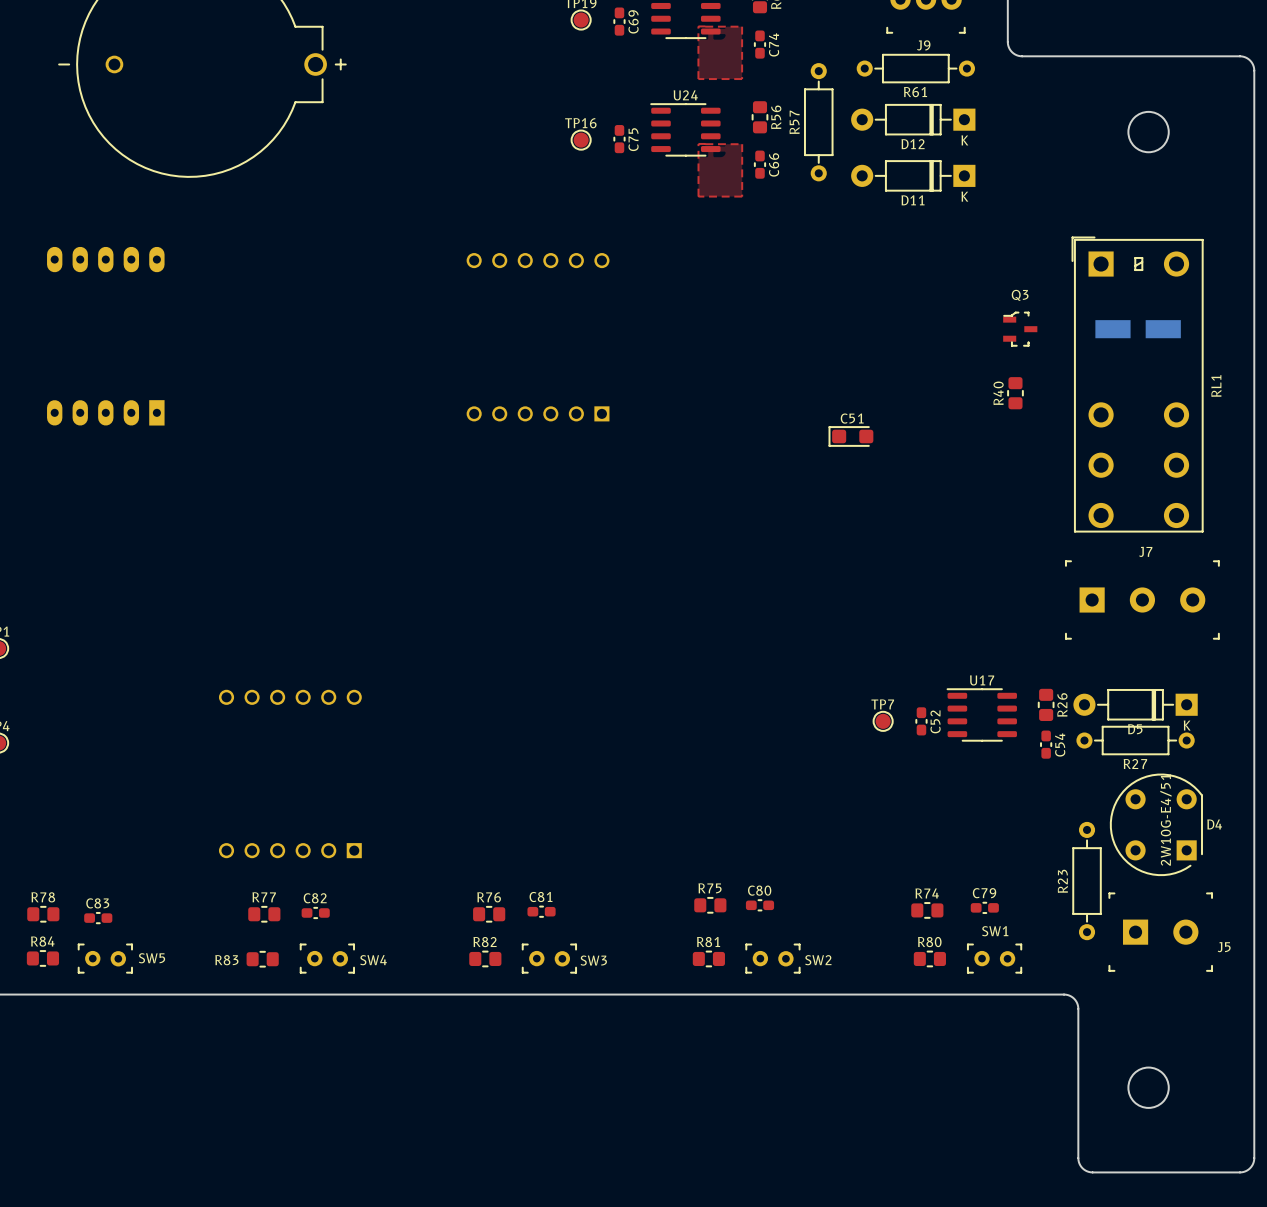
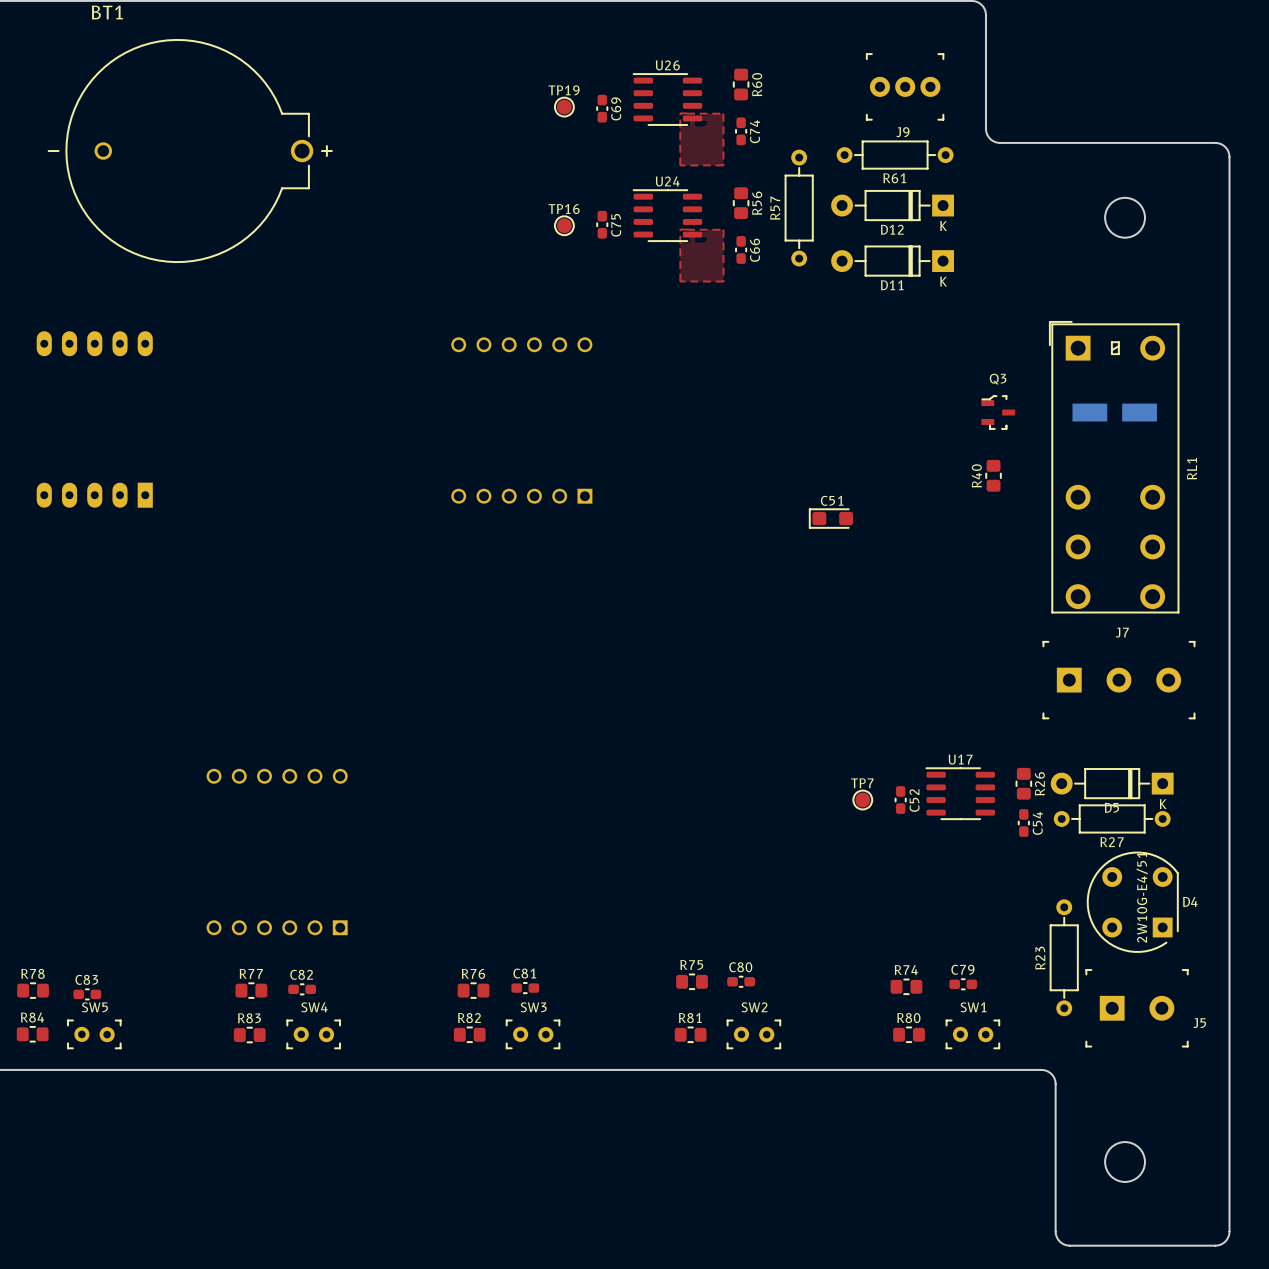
SW5 name position: SW5 (151, 958) -> SW5 (94, 1007)
R83 name position: R83 (226, 960) -> R83 (249, 1018)
SW4 name position: SW4 (373, 960) -> SW4 (314, 1007)
SW3 name position: SW3 (593, 960) -> SW3 (533, 1007)
SW2 name position: SW2 (818, 960) -> SW2 (754, 1007)

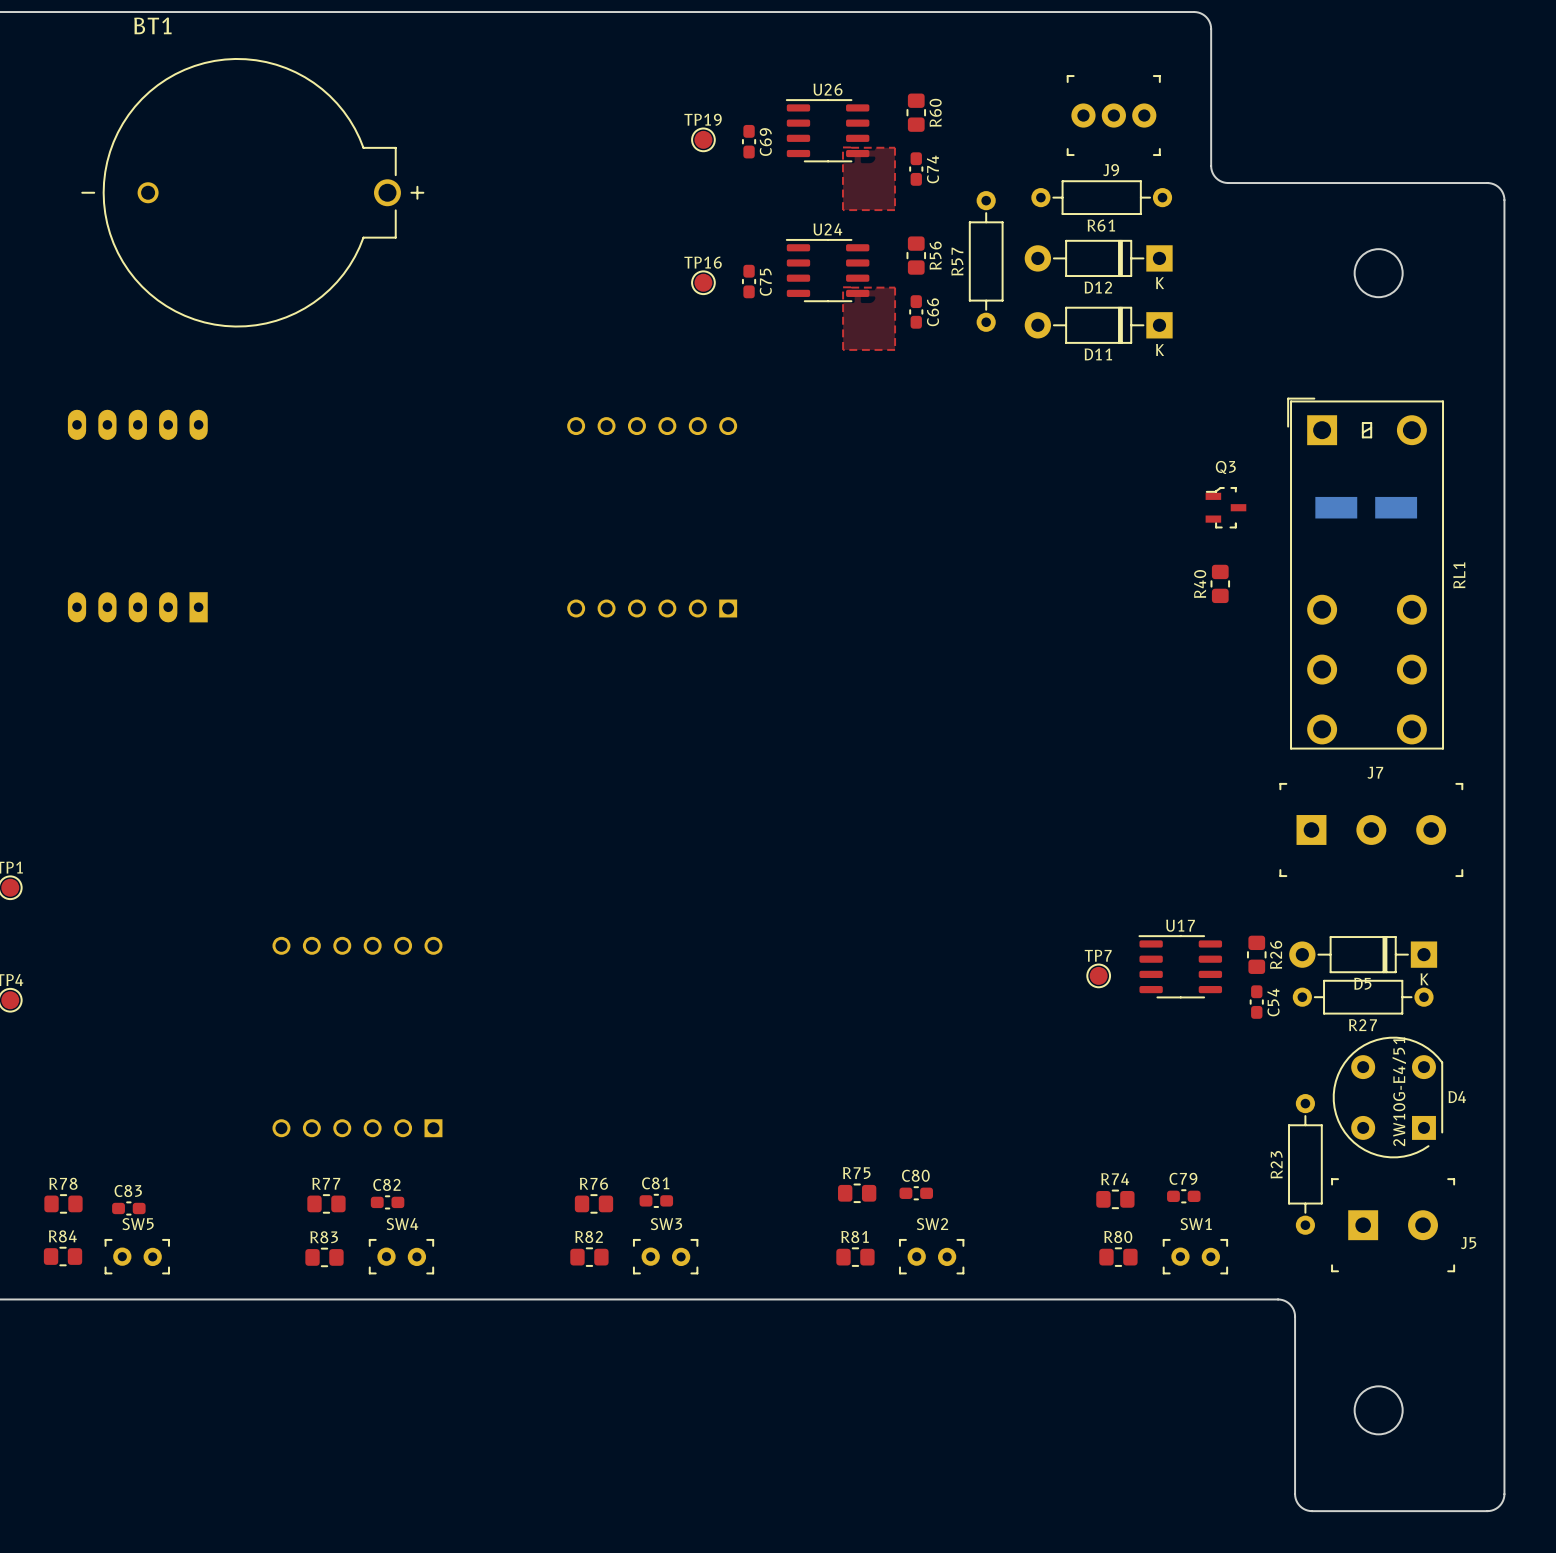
C51: (831, 518) -> none
TP7 position: (862, 800) -> (1098, 975)
C52: (900, 800) -> none

